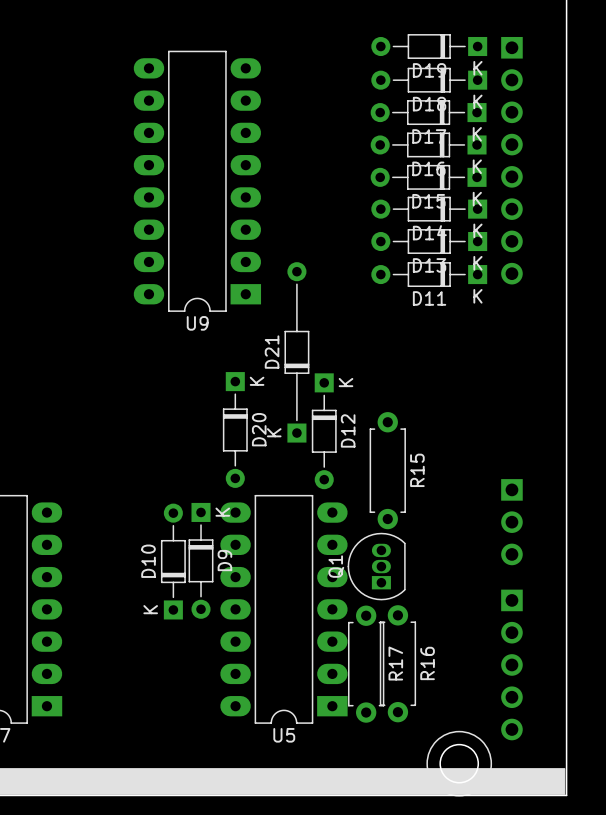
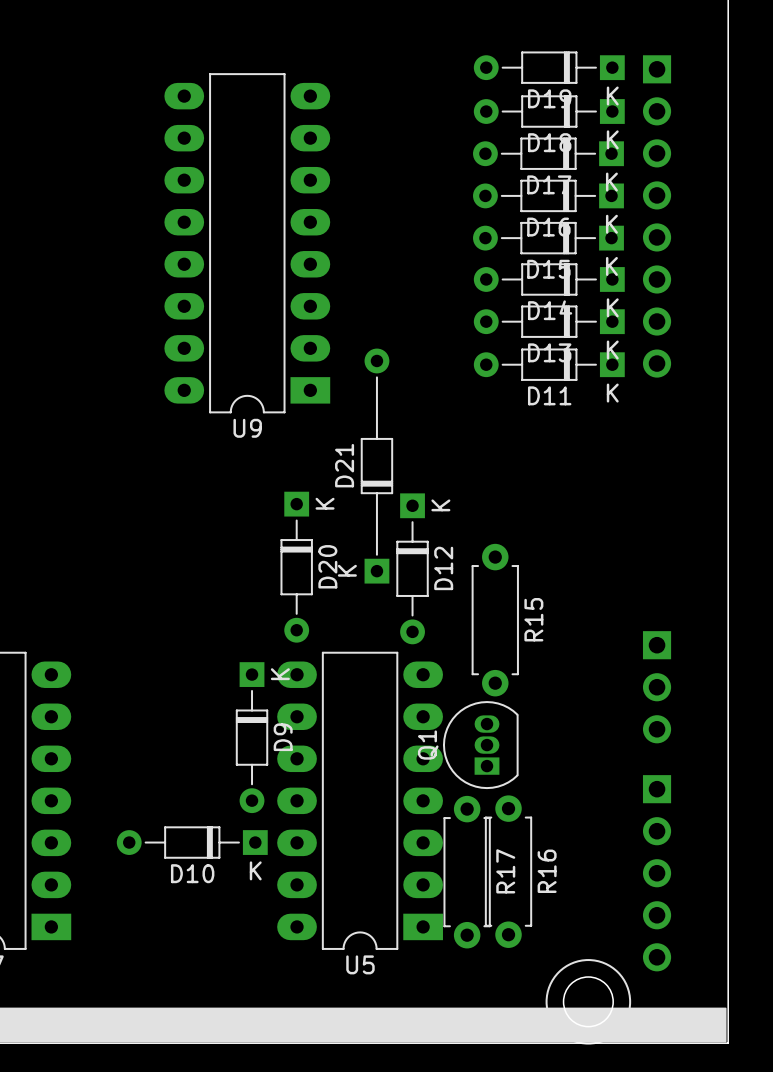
D10 rotation: 0° (173, 561) -> 90° counterclockwise (192, 842)
D10 position: (173, 561) -> (192, 842)

